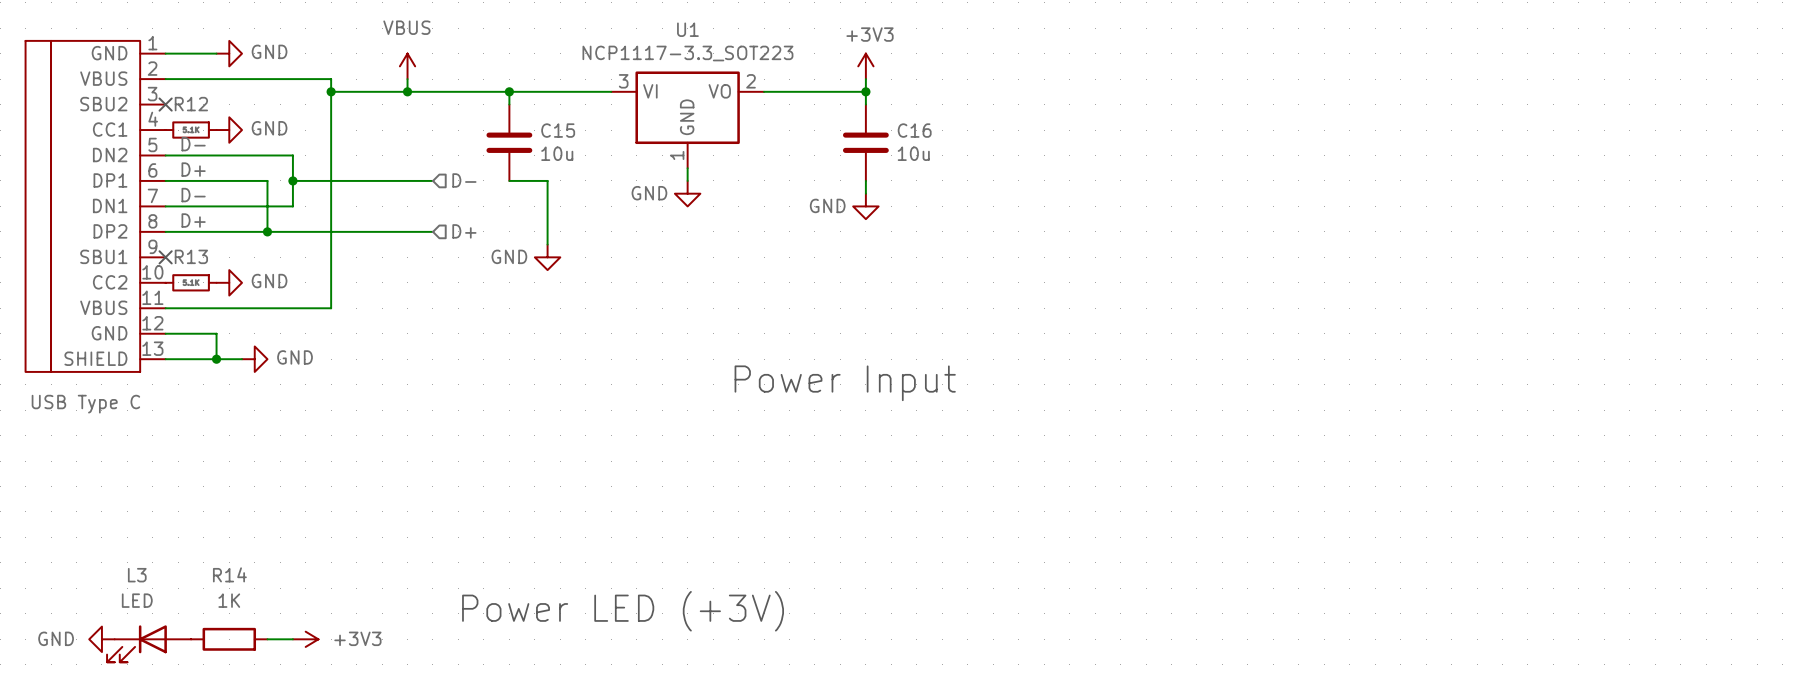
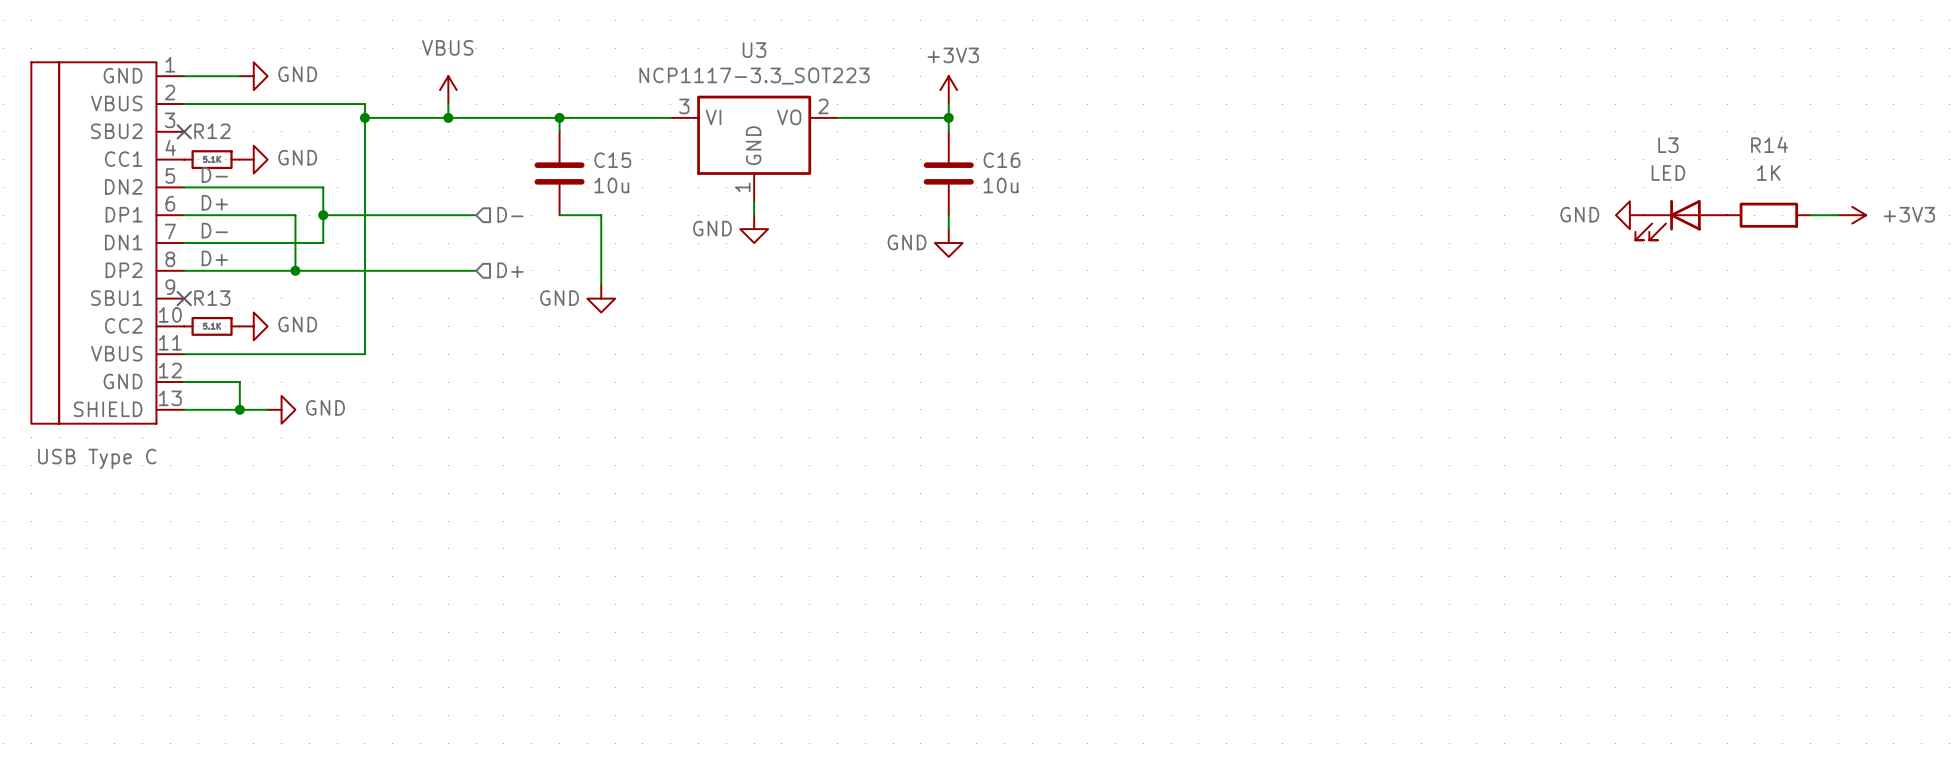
U1 name: U1 (687, 29) -> U3 (754, 50)
power symbol: none -> GND (1629, 215)
wire: none -> (1810, 215) (1838, 215)
power symbol: none -> +3V3 (1852, 215)
text: Power Input (845, 383) -> none
text: Power LED (+3V) (623, 611) -> none
power symbol: GND (101, 639) -> none
R14 position: (229, 639) -> (1768, 215)
wire: (267, 639) (292, 639) -> none
power symbol: +3V3 (305, 639) -> none
L3 position: (149, 643) -> (1681, 220)

